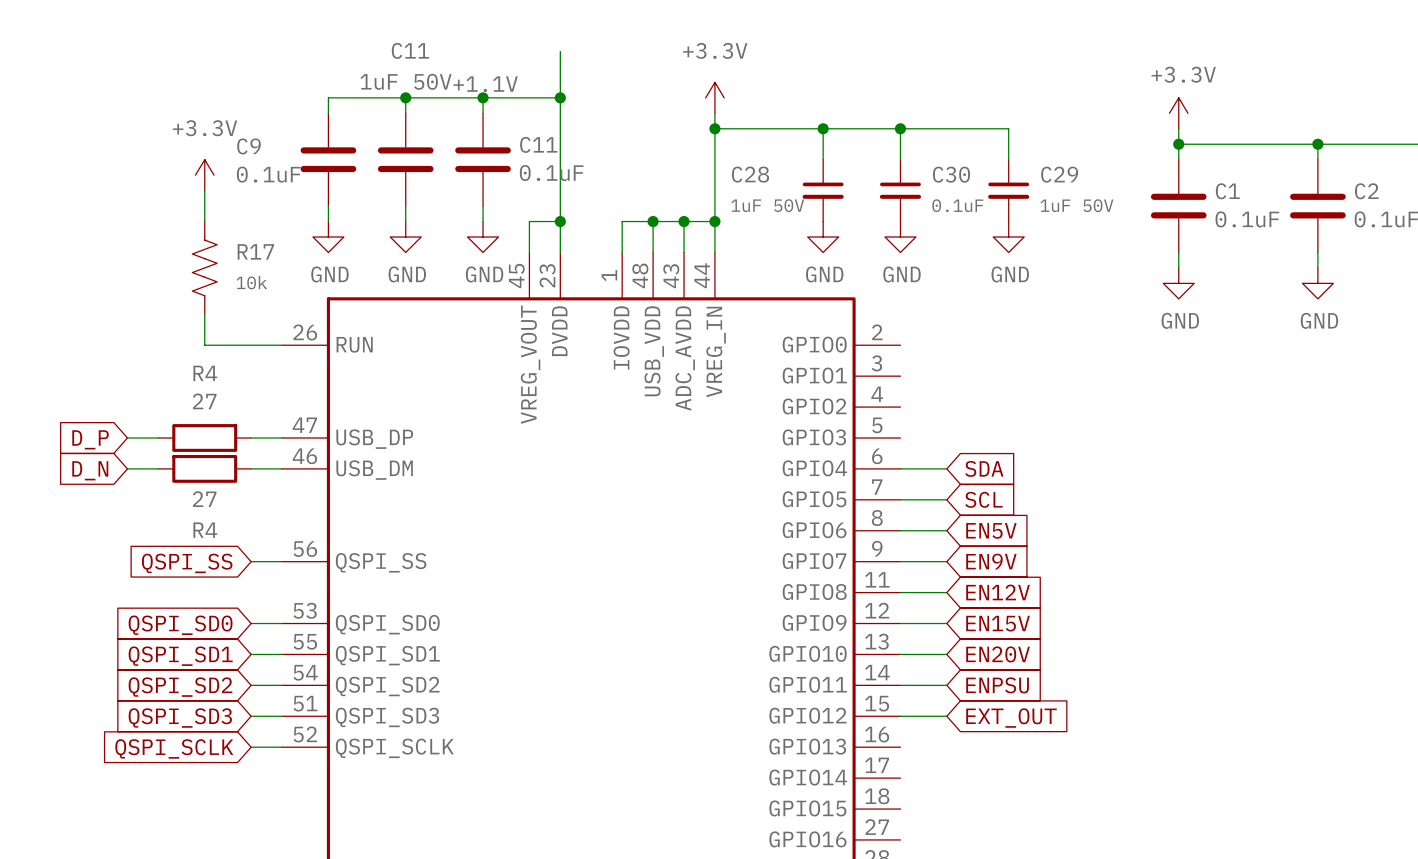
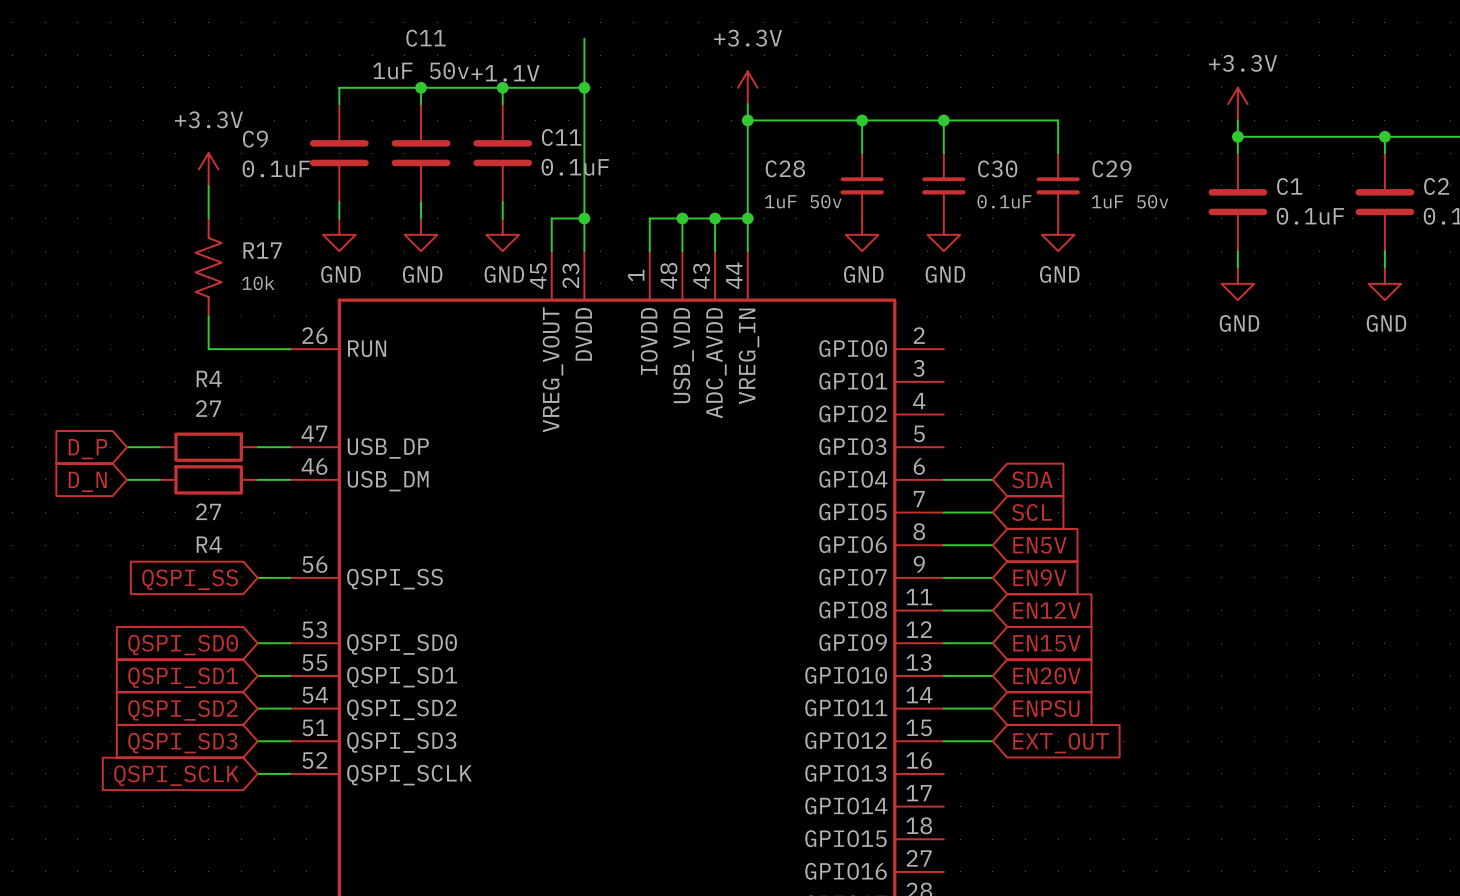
C11 value: 1uF 50V (406, 81) -> 1uF 50v (421, 70)
C28 value: 1uF 50V (767, 205) -> 1uF 50v (803, 201)
C29 value: 1uF 50V (1076, 205) -> 1uF 50v (1130, 201)

